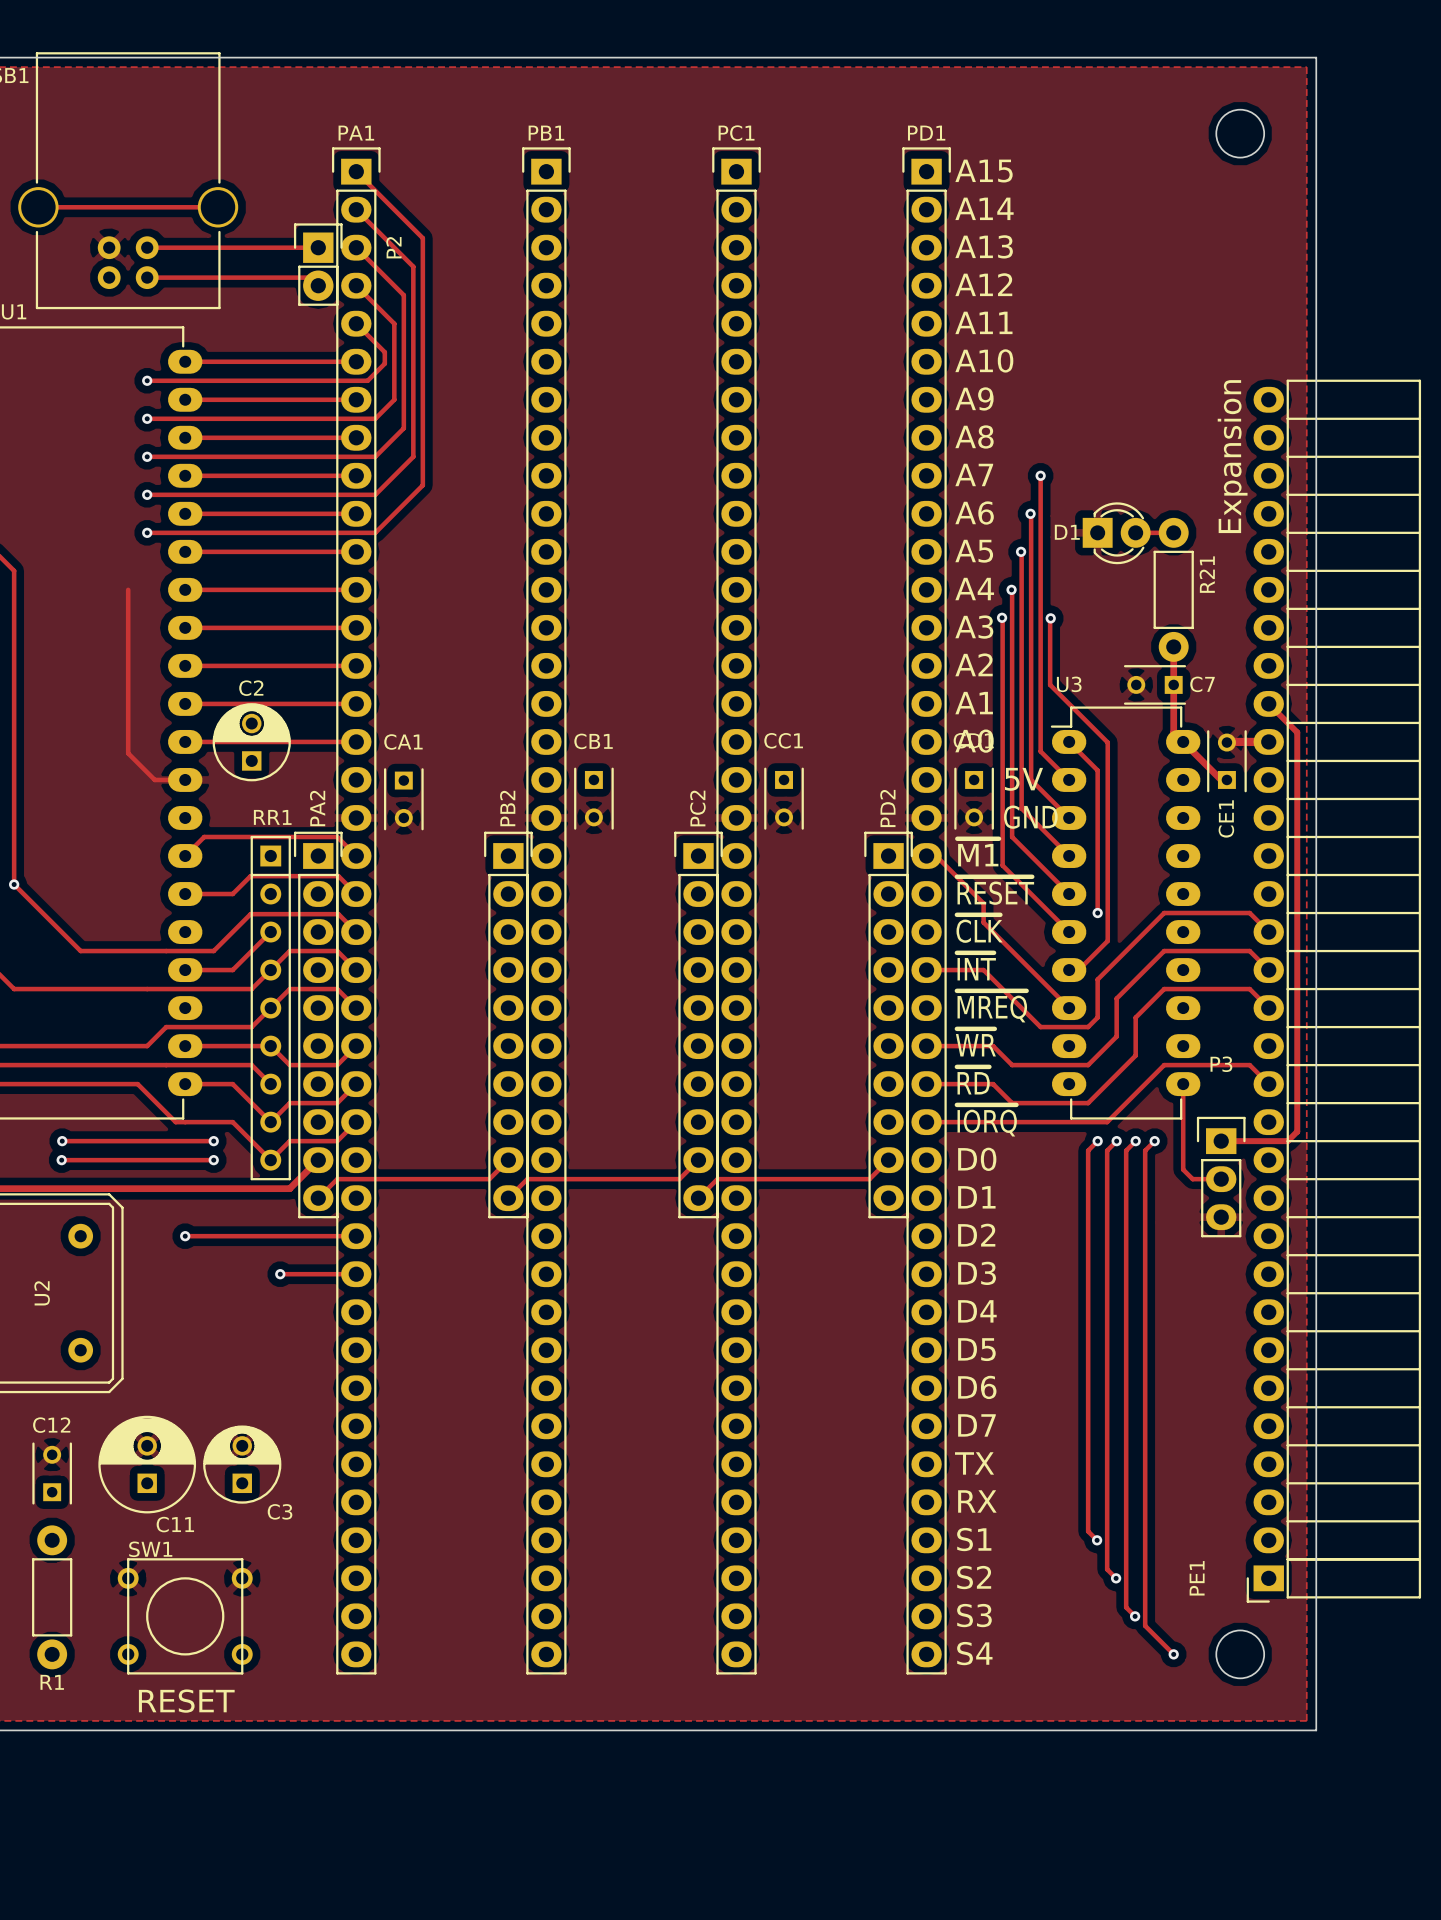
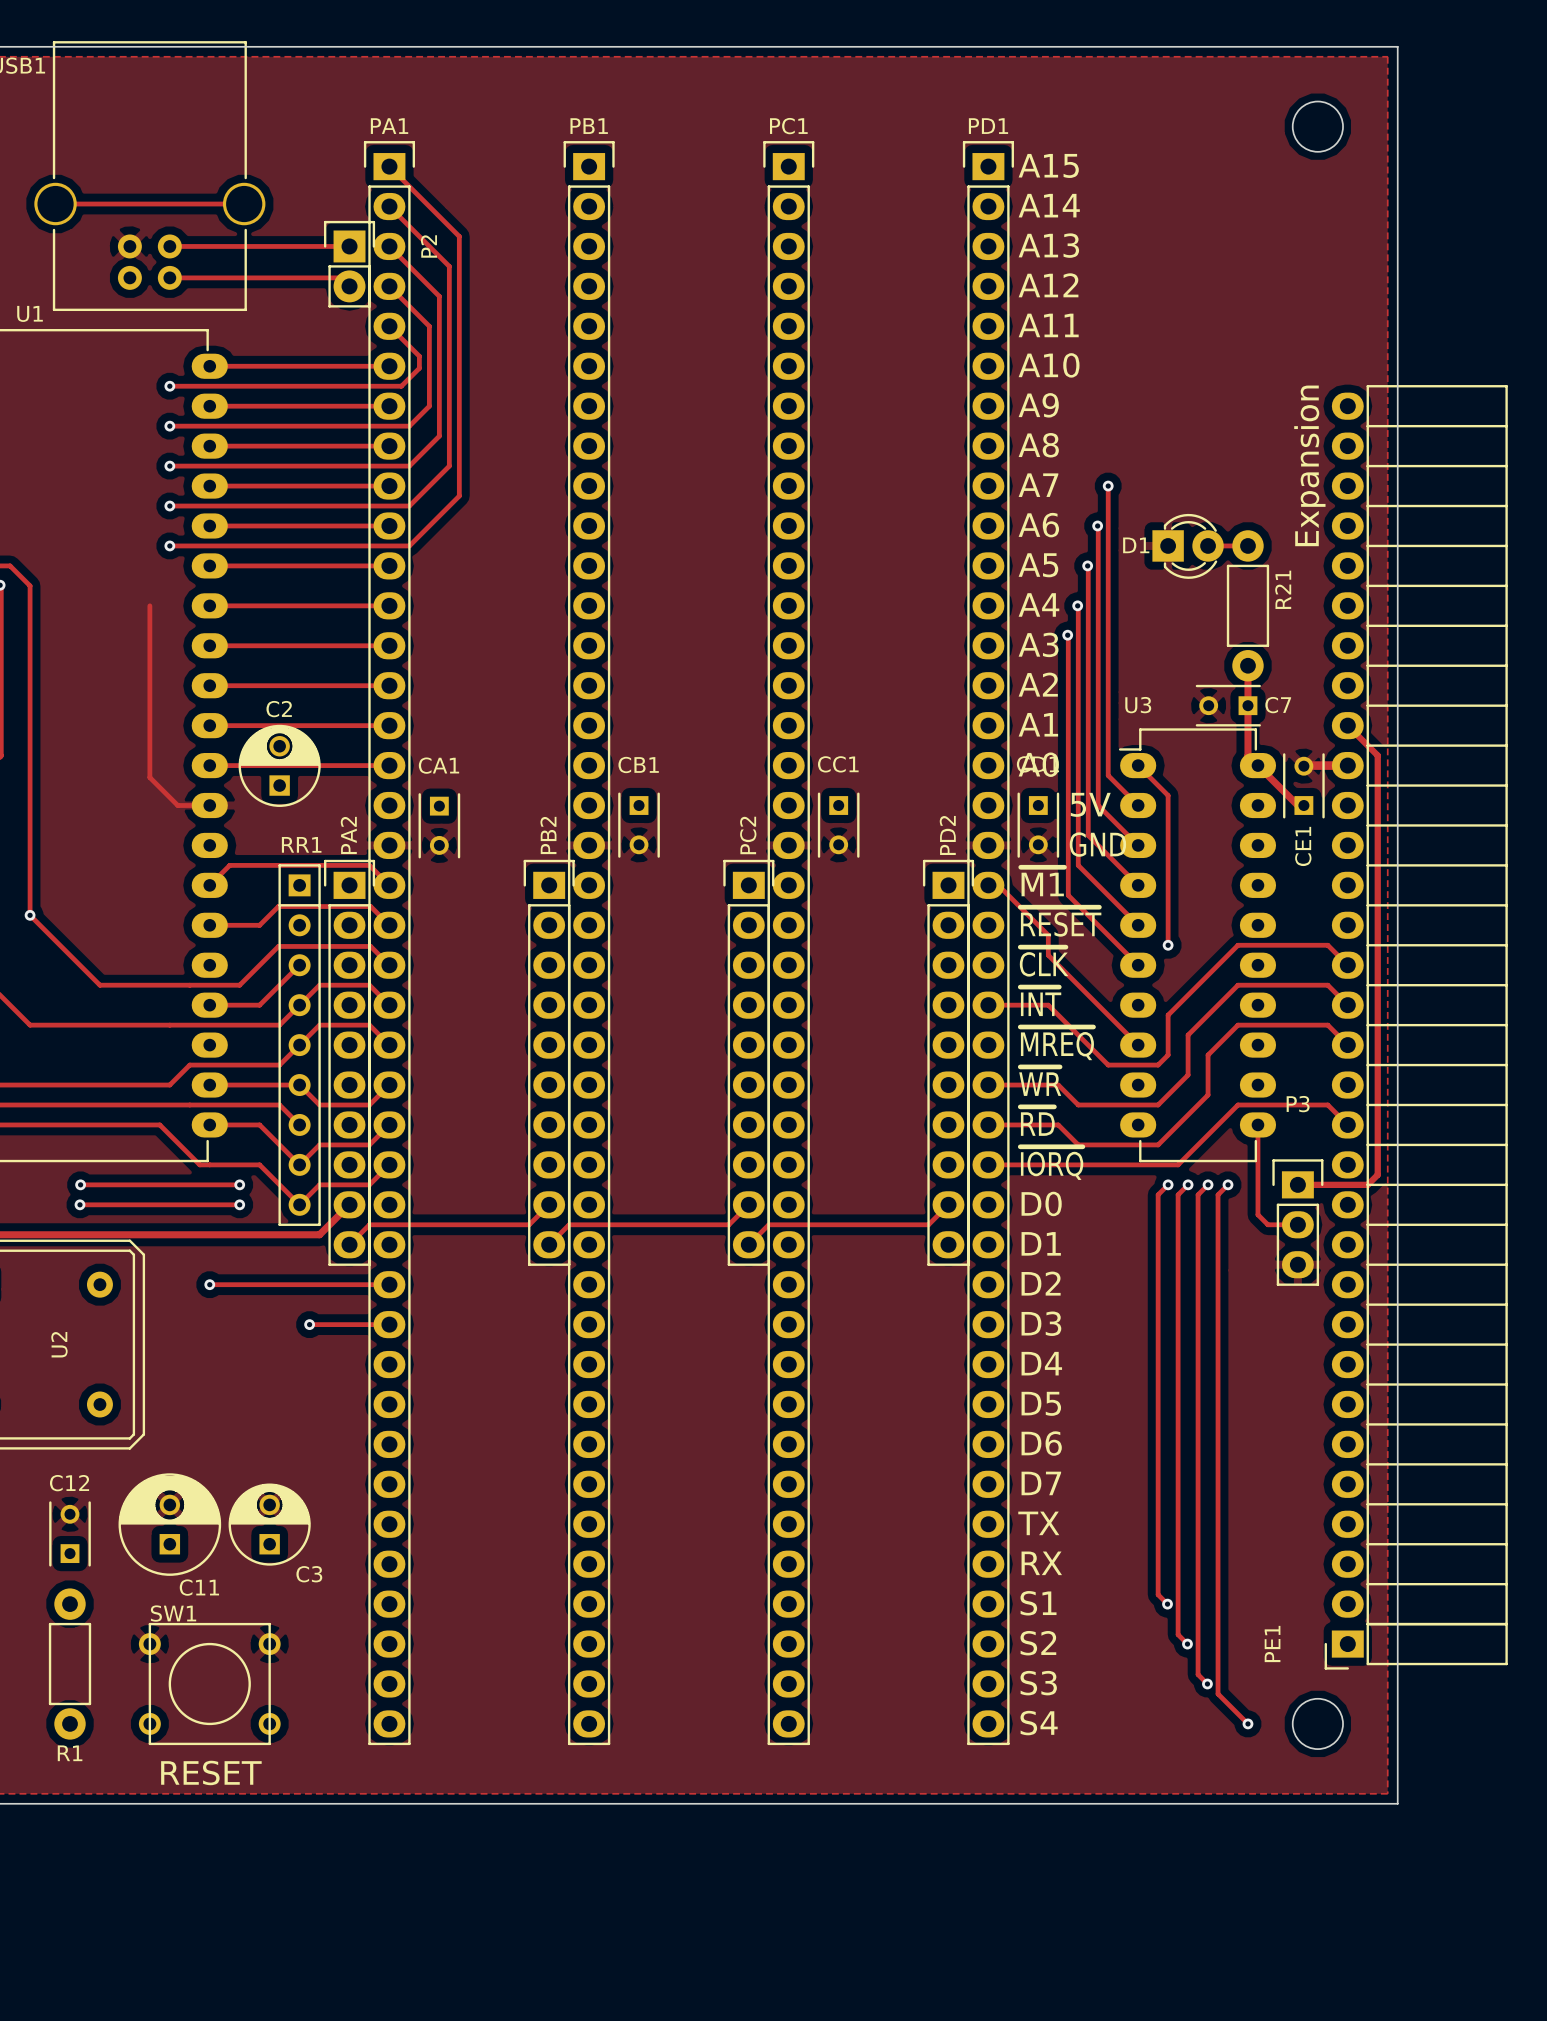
track: (1050, 618) (1050, 684) (1107, 742) (1107, 940) (1078, 970) (1069, 970) -> none
via: (1050, 618) -> none

